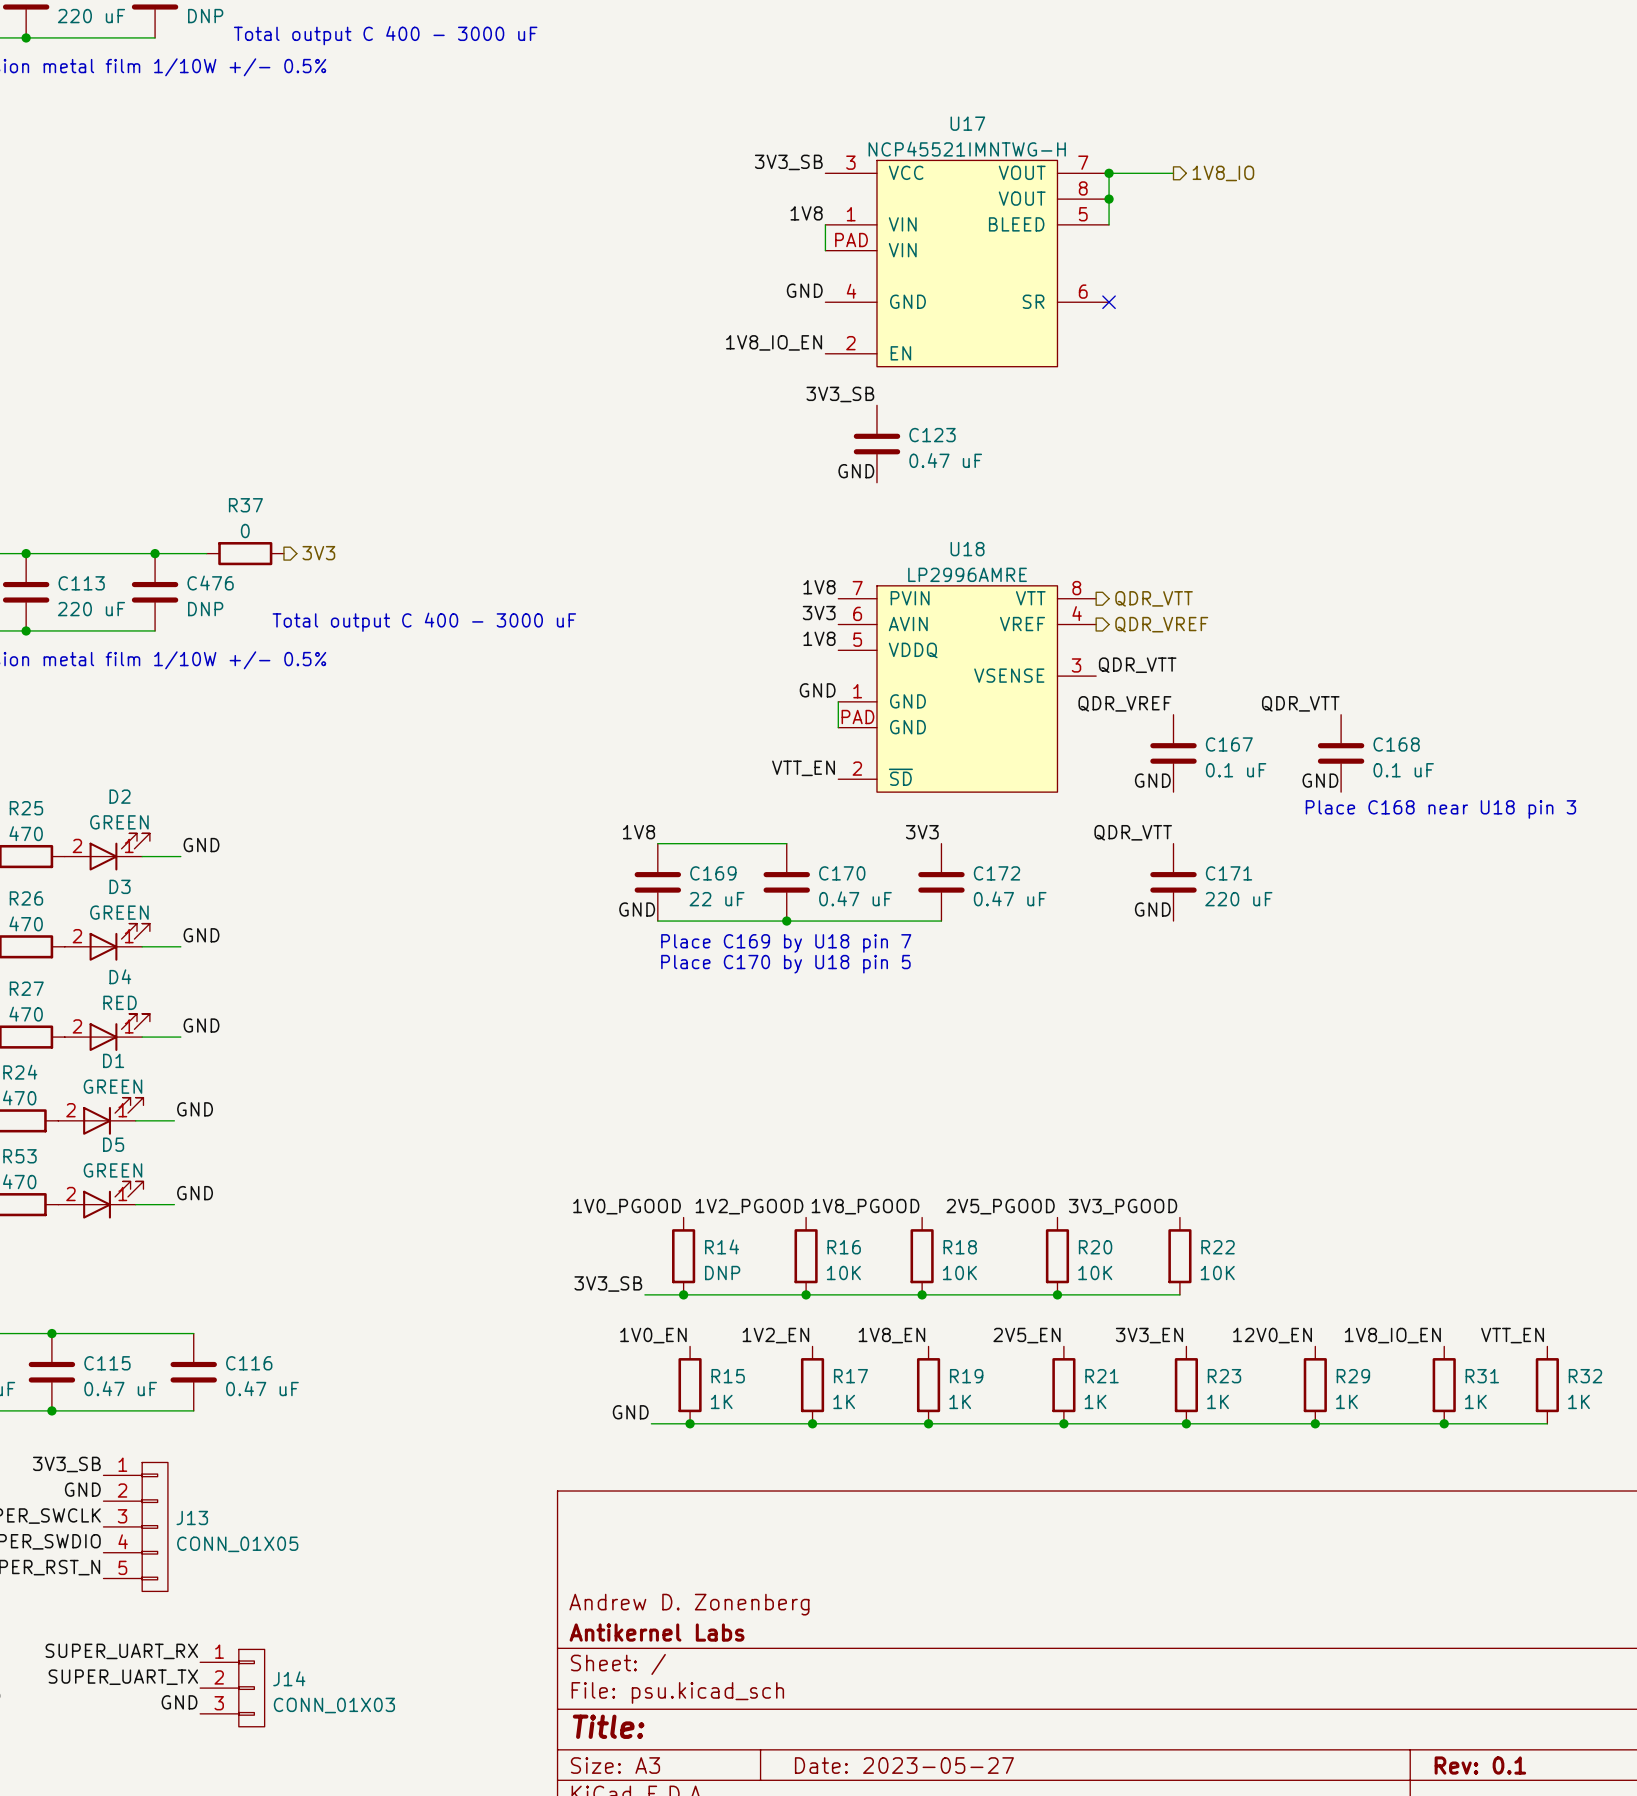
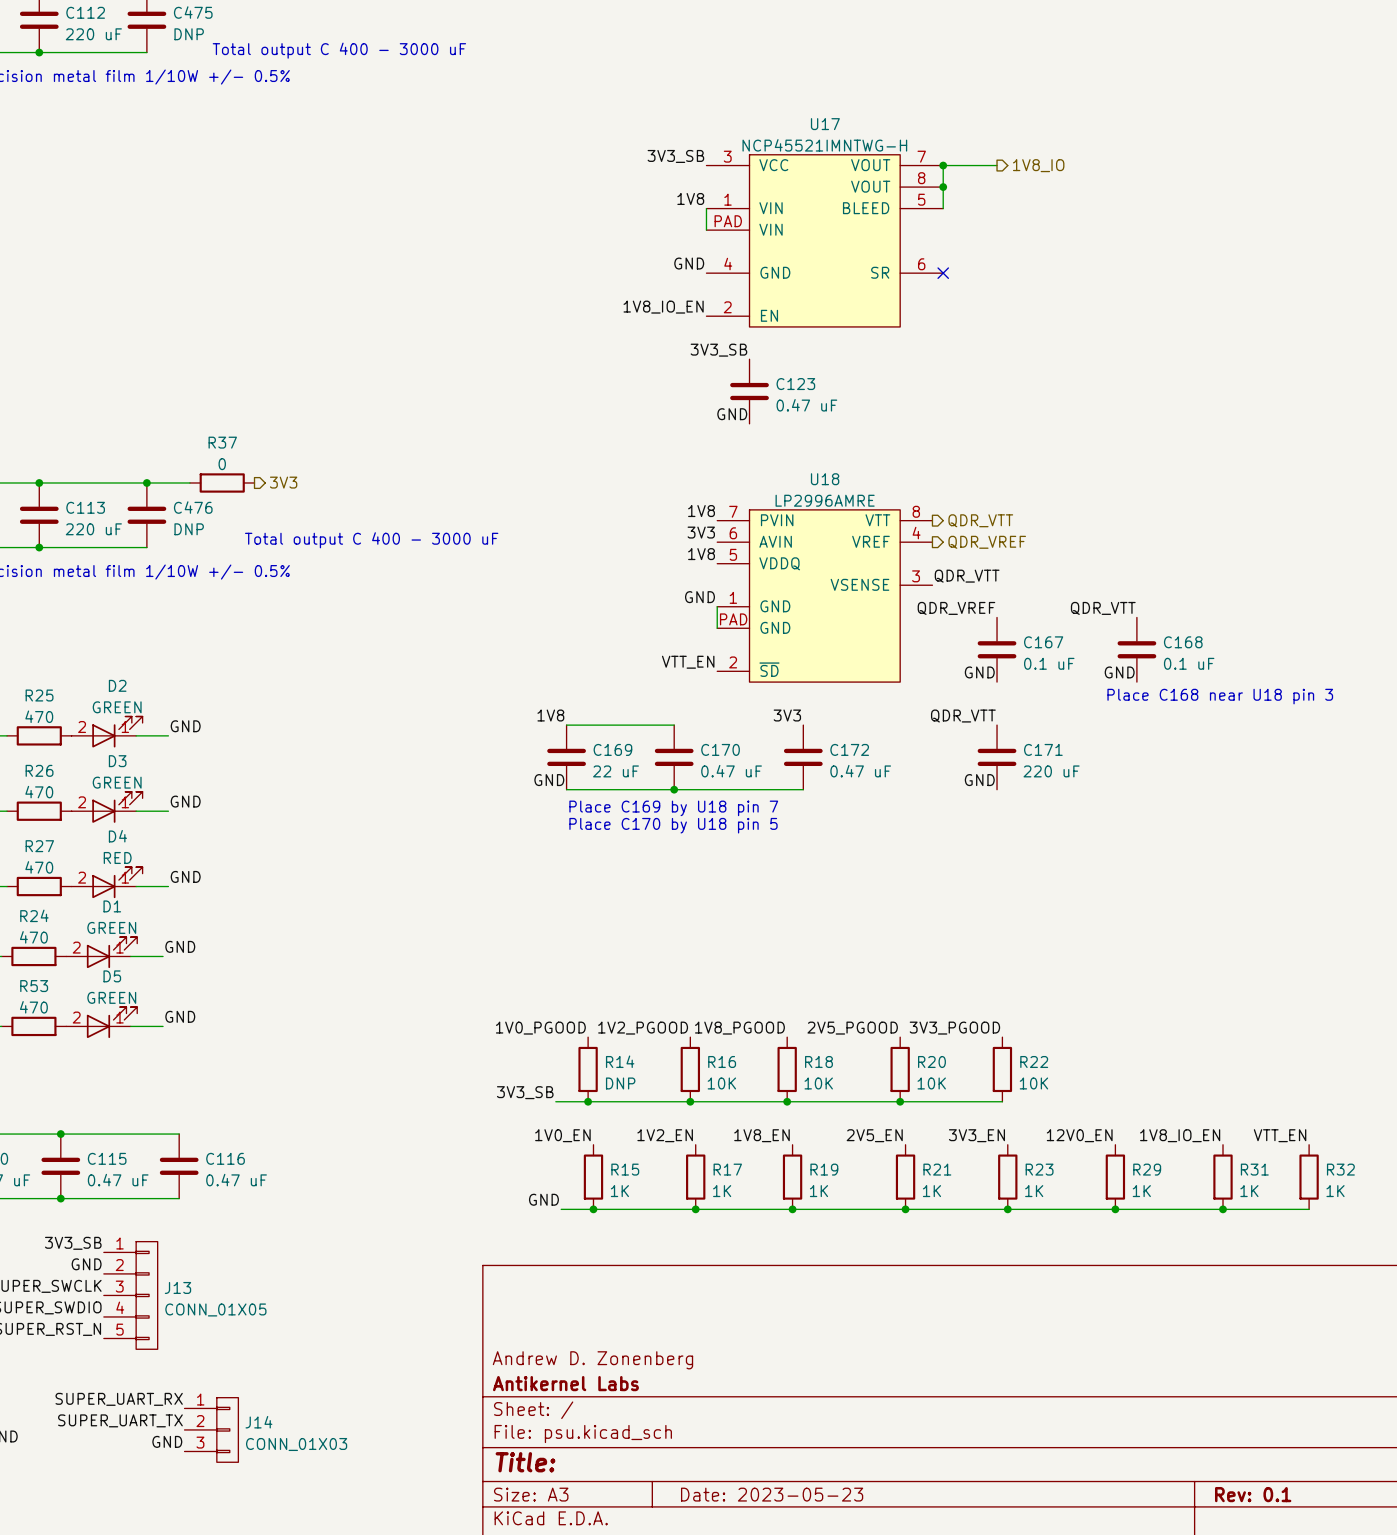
title block: Date: 2023-05-27 (904, 1765) -> Date: 2023-05-23 (772, 1494)

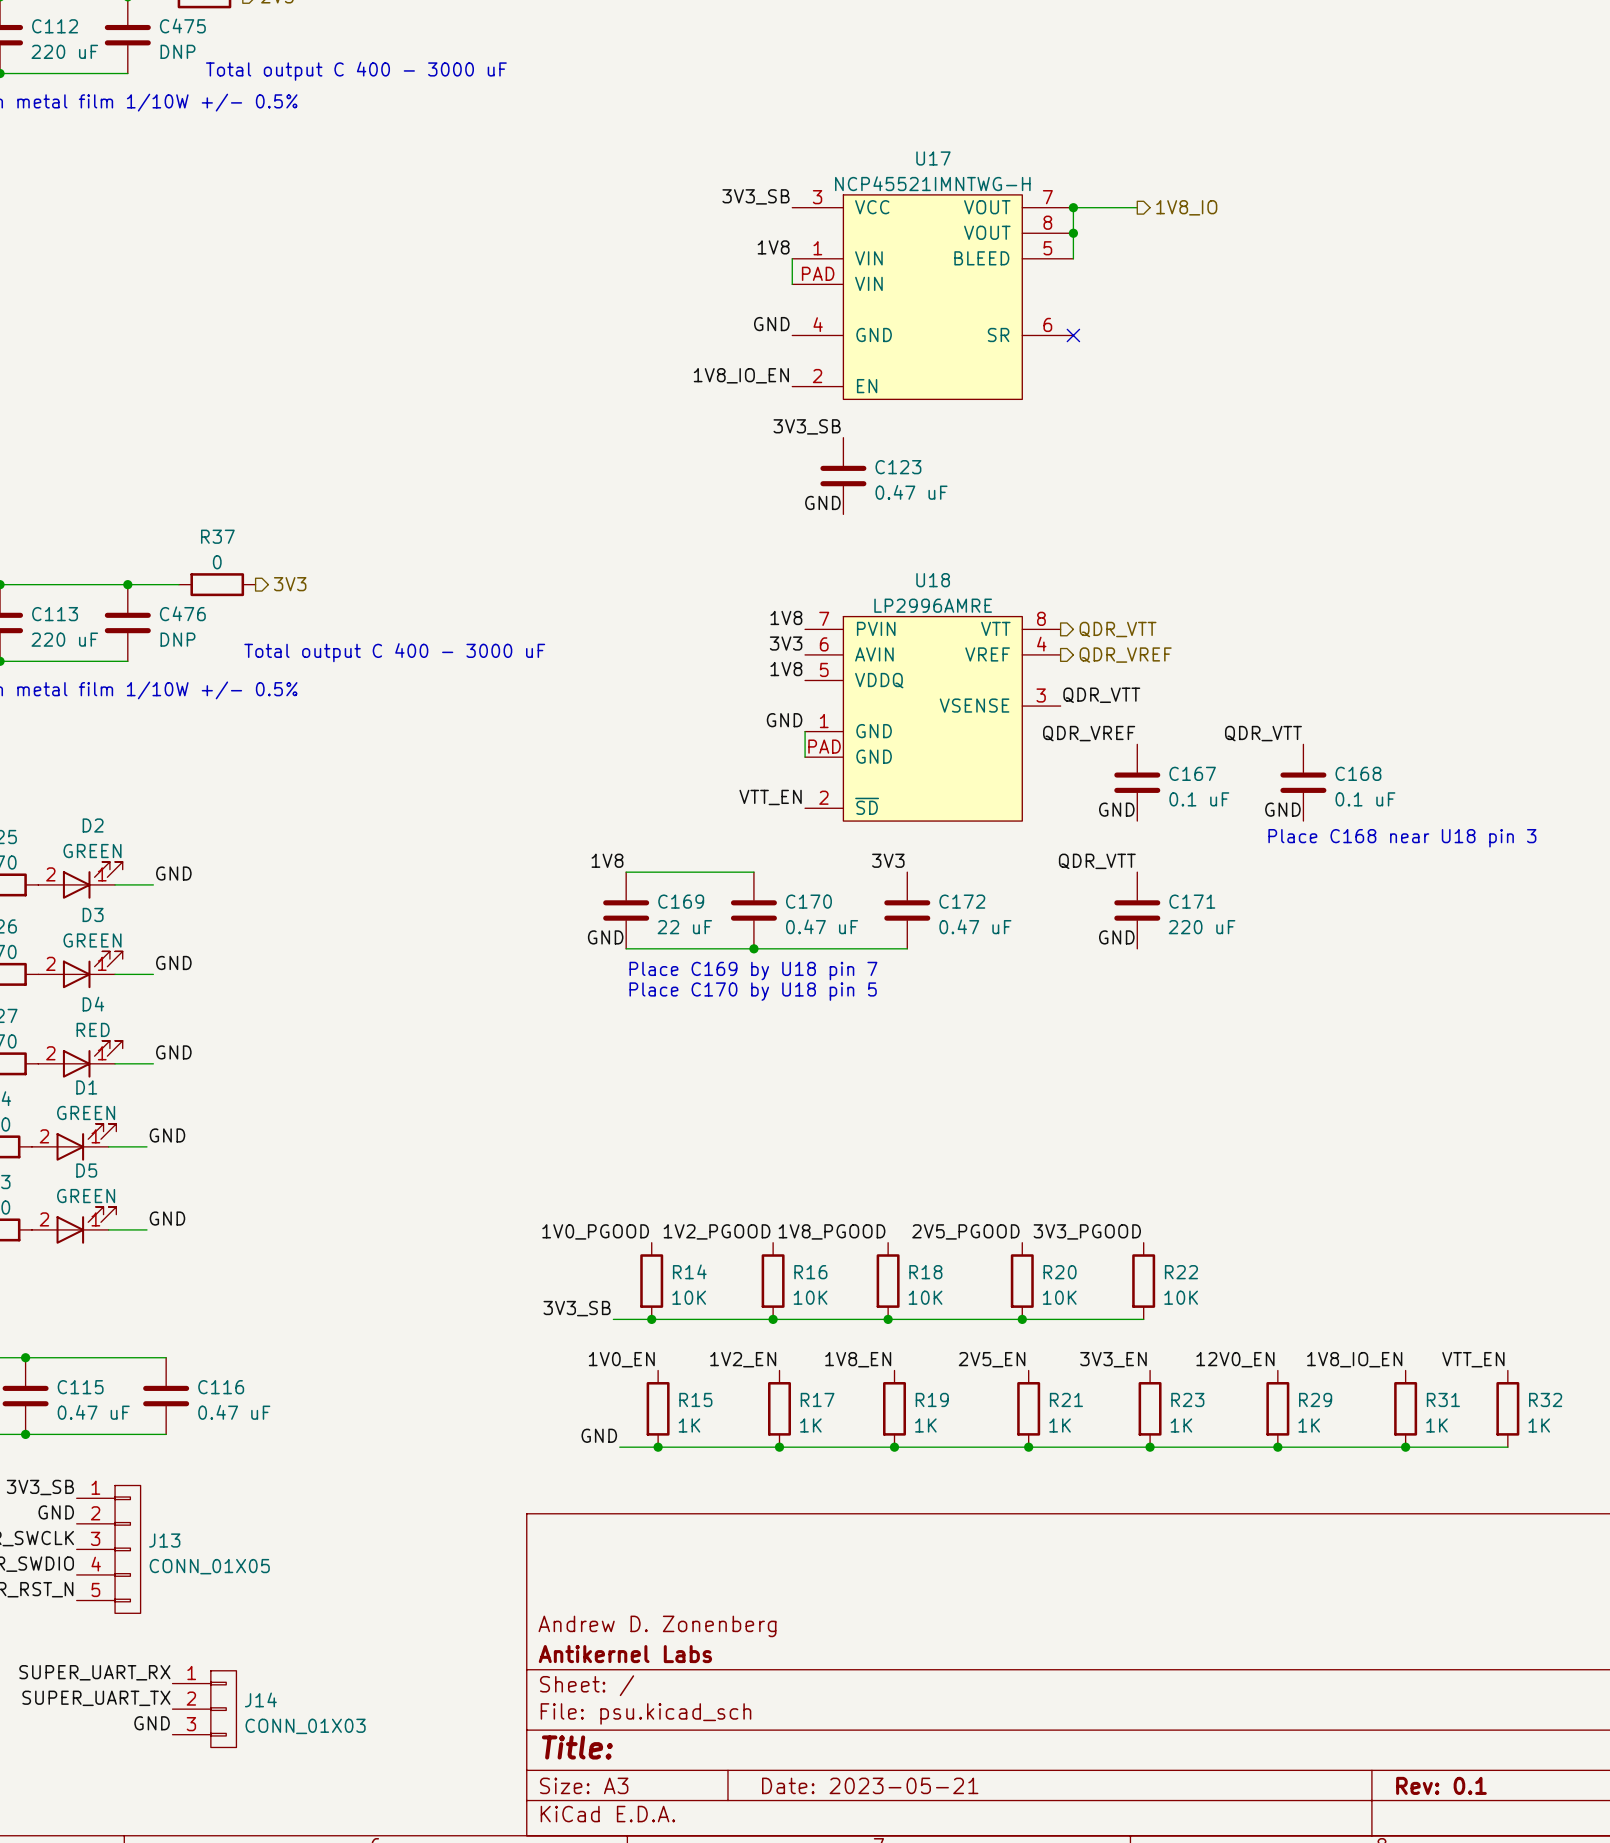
R14 value: DNP (620, 1083) -> 10K (689, 1297)
title block: Date: 2023-05-23 (772, 1494) -> Date: 2023-05-21 (870, 1785)

